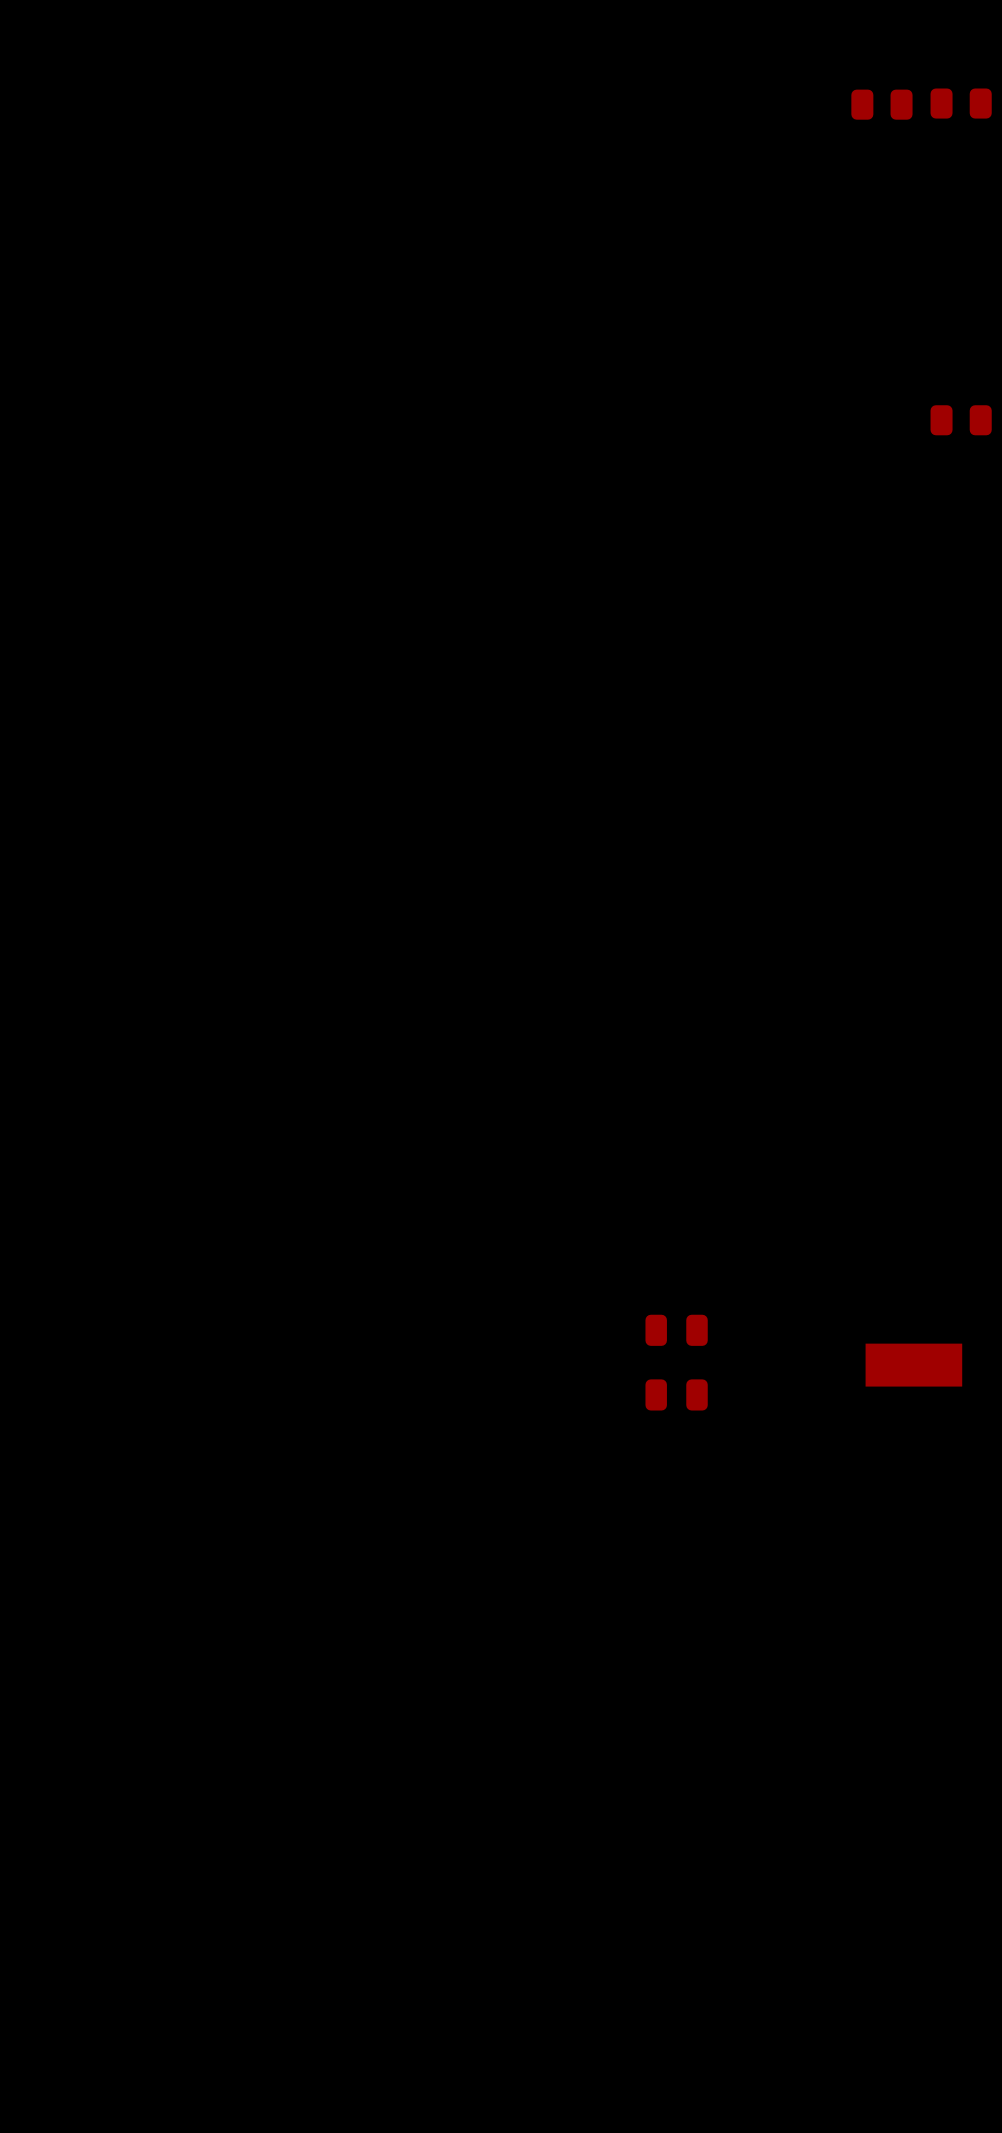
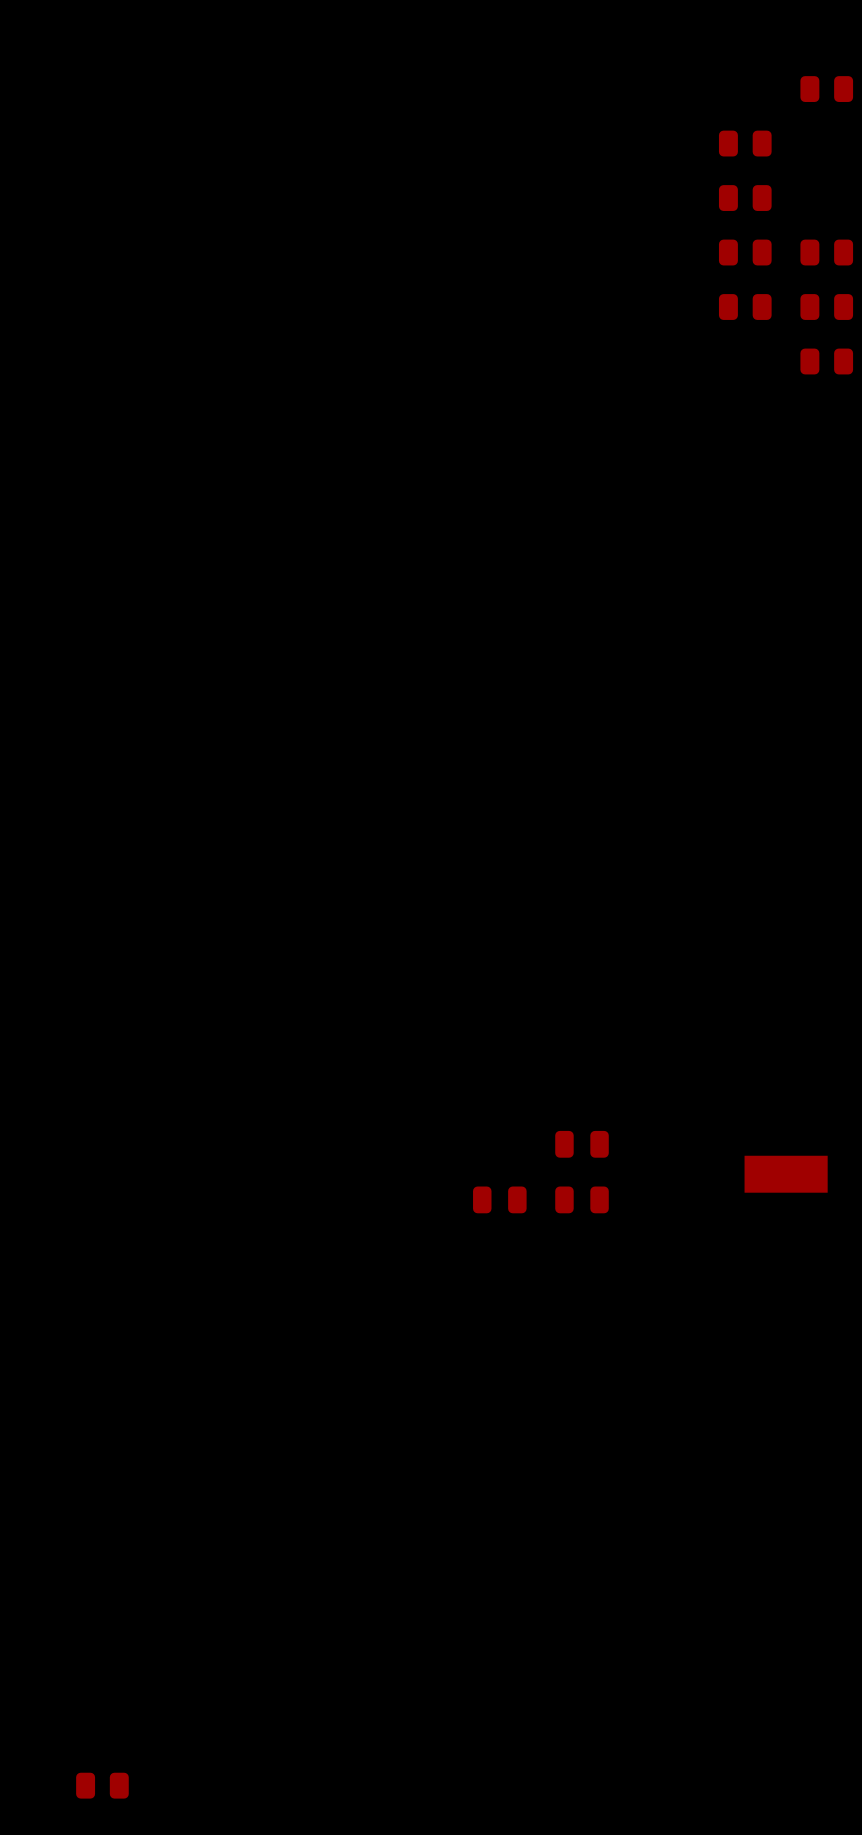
part: (881, 104) -> none
part: none -> (745, 143)
part: none -> (745, 198)
part: none -> (745, 252)
part: none -> (826, 252)
part: none -> (745, 307)
part: none -> (826, 307)
part: none -> (499, 1199)
part: none -> (102, 1785)

